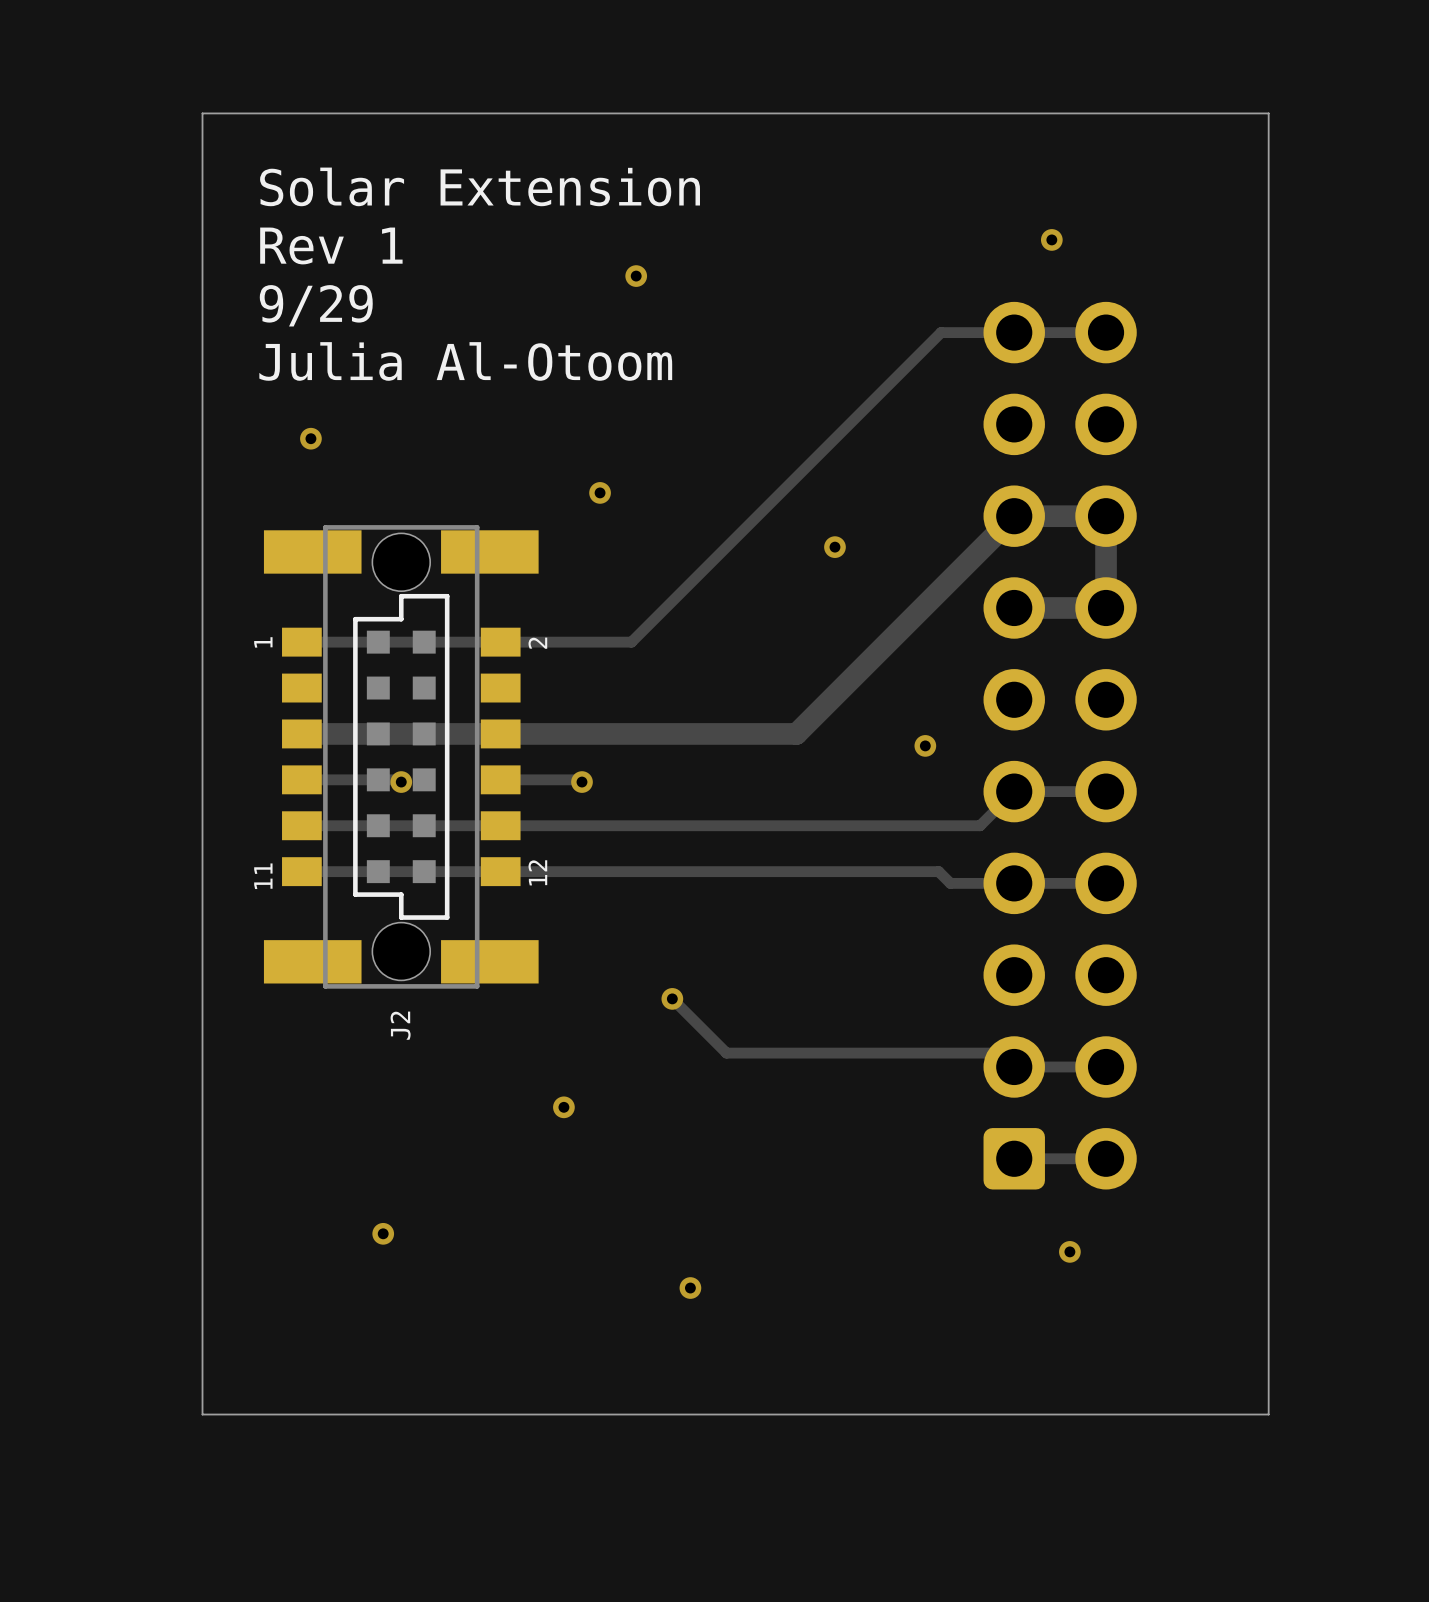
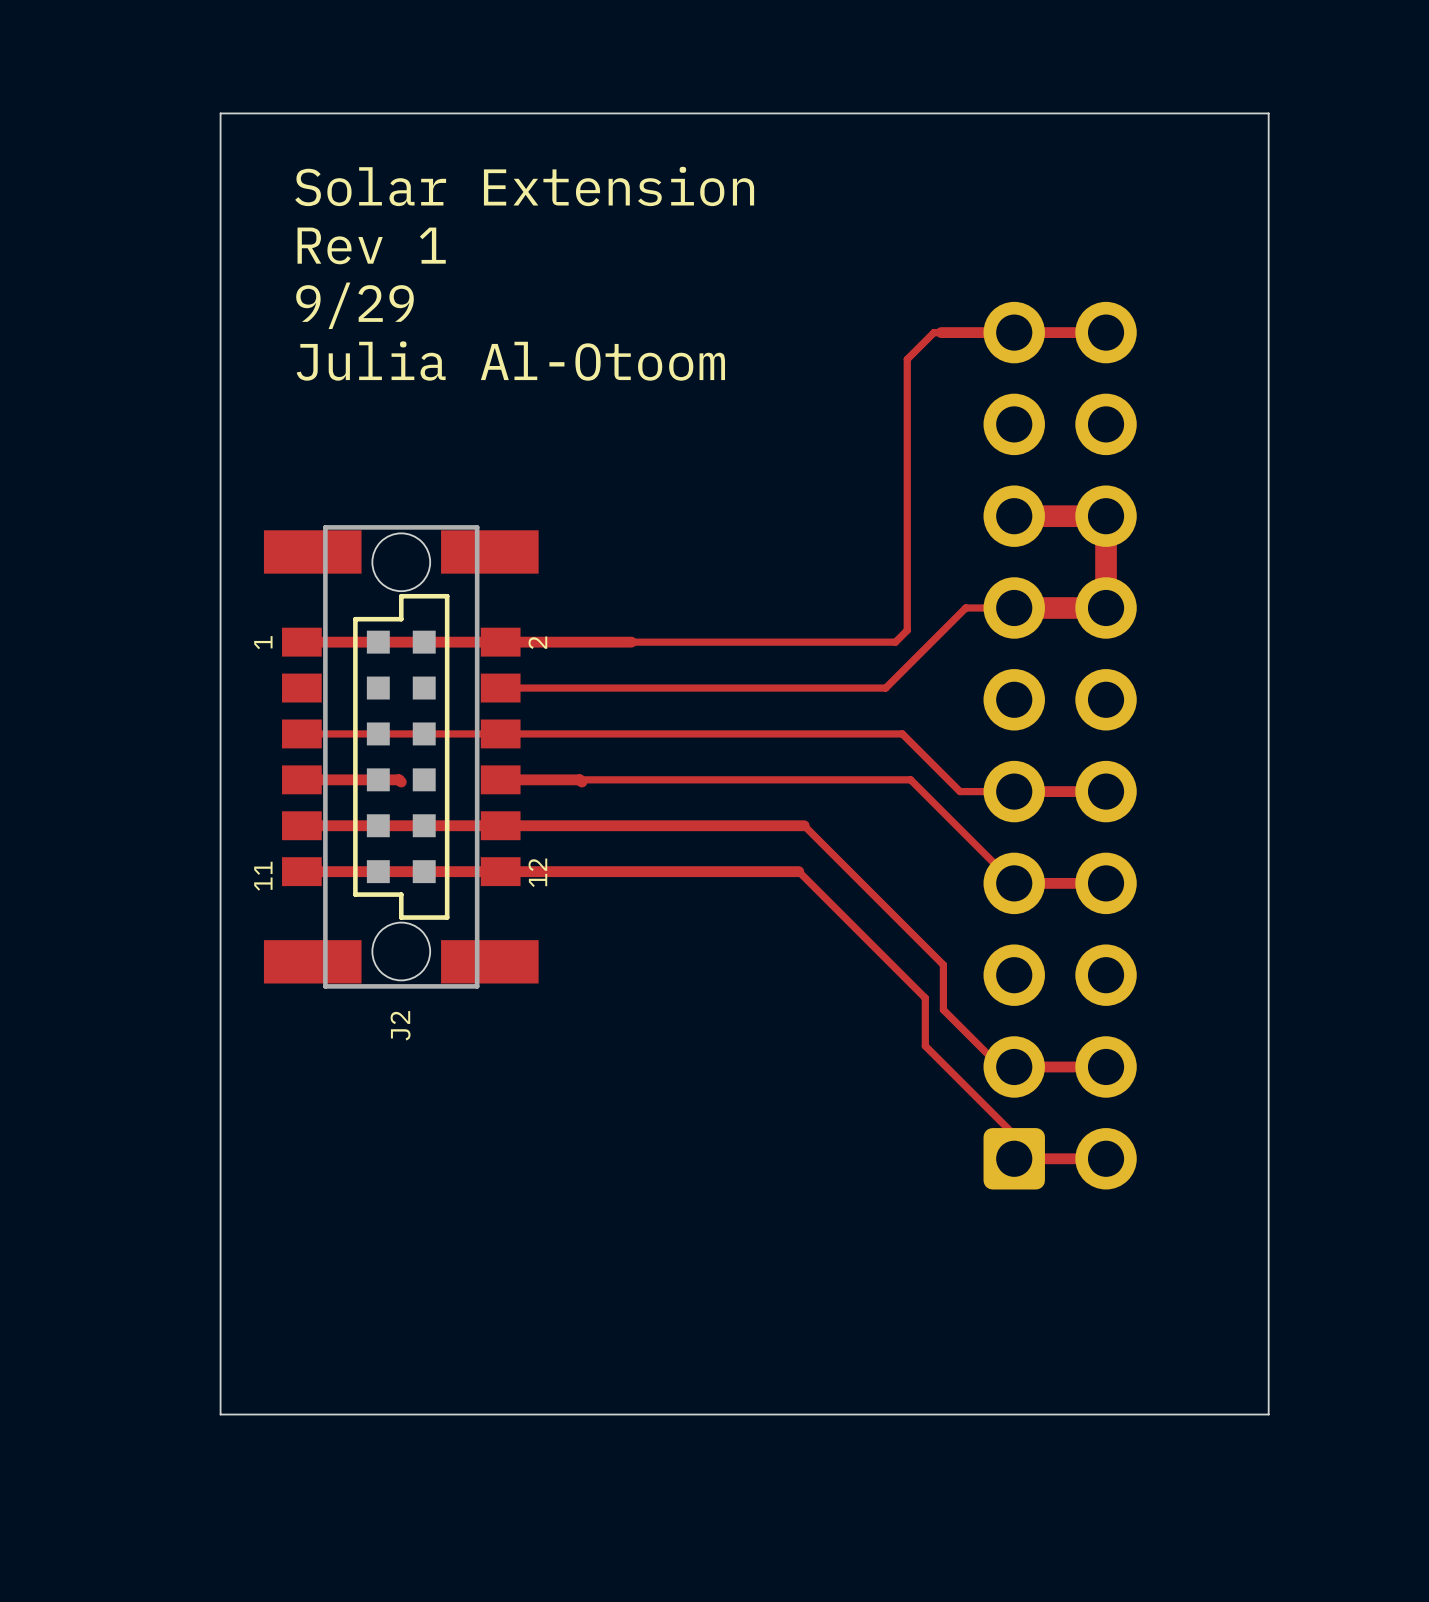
board edge: (220, 113) (202, 113) (202, 1414) (220, 1414) -> (220, 113) (220, 1414)
text position: Solar Extension (480, 186) -> Solar Extension (524, 186)
via: (1051, 239) -> none
text position: Rev 1 (331, 245) -> Rev 1 (371, 245)
via: (636, 276) -> none
text position: 9/29 (316, 305) -> 9/29 (354, 305)
track: (941, 332) (631, 642) -> (941, 332) (934, 332) (907, 359) (907, 630) (895, 642) (631, 642)
text position: Julia Al-Otoom (465, 361) -> Julia Al-Otoom (510, 361)
via: (310, 438) -> none
via: (600, 492) -> none
track: (1014, 516) (796, 733) -> none
via: (834, 547) -> none
track: none -> (1014, 607) (965, 607) (885, 688) (500, 688)
track width: thick (301, 733) (796, 733) -> thin (301, 733) (796, 733)
via: (925, 745) -> none
via: (401, 782) -> none
via: (581, 782) -> none
track: (1014, 791) (980, 825) (804, 825) -> (1014, 791) (960, 791) (902, 733) (796, 733)
track: (798, 871) (938, 871) (950, 883) (1014, 883) -> (579, 779) (910, 779) (1014, 883)
track: none -> (798, 871) (925, 998) (925, 1046) (1014, 1134) (1014, 1158)
track: (672, 998) (726, 1053) (1000, 1053) (1014, 1066) -> (804, 825) (943, 964) (943, 1009) (1000, 1066) (1014, 1066)
via: (672, 998) -> none
via: (563, 1107) -> none
via: (383, 1233) -> none
via: (1069, 1251) -> none
via: (690, 1288) -> none

